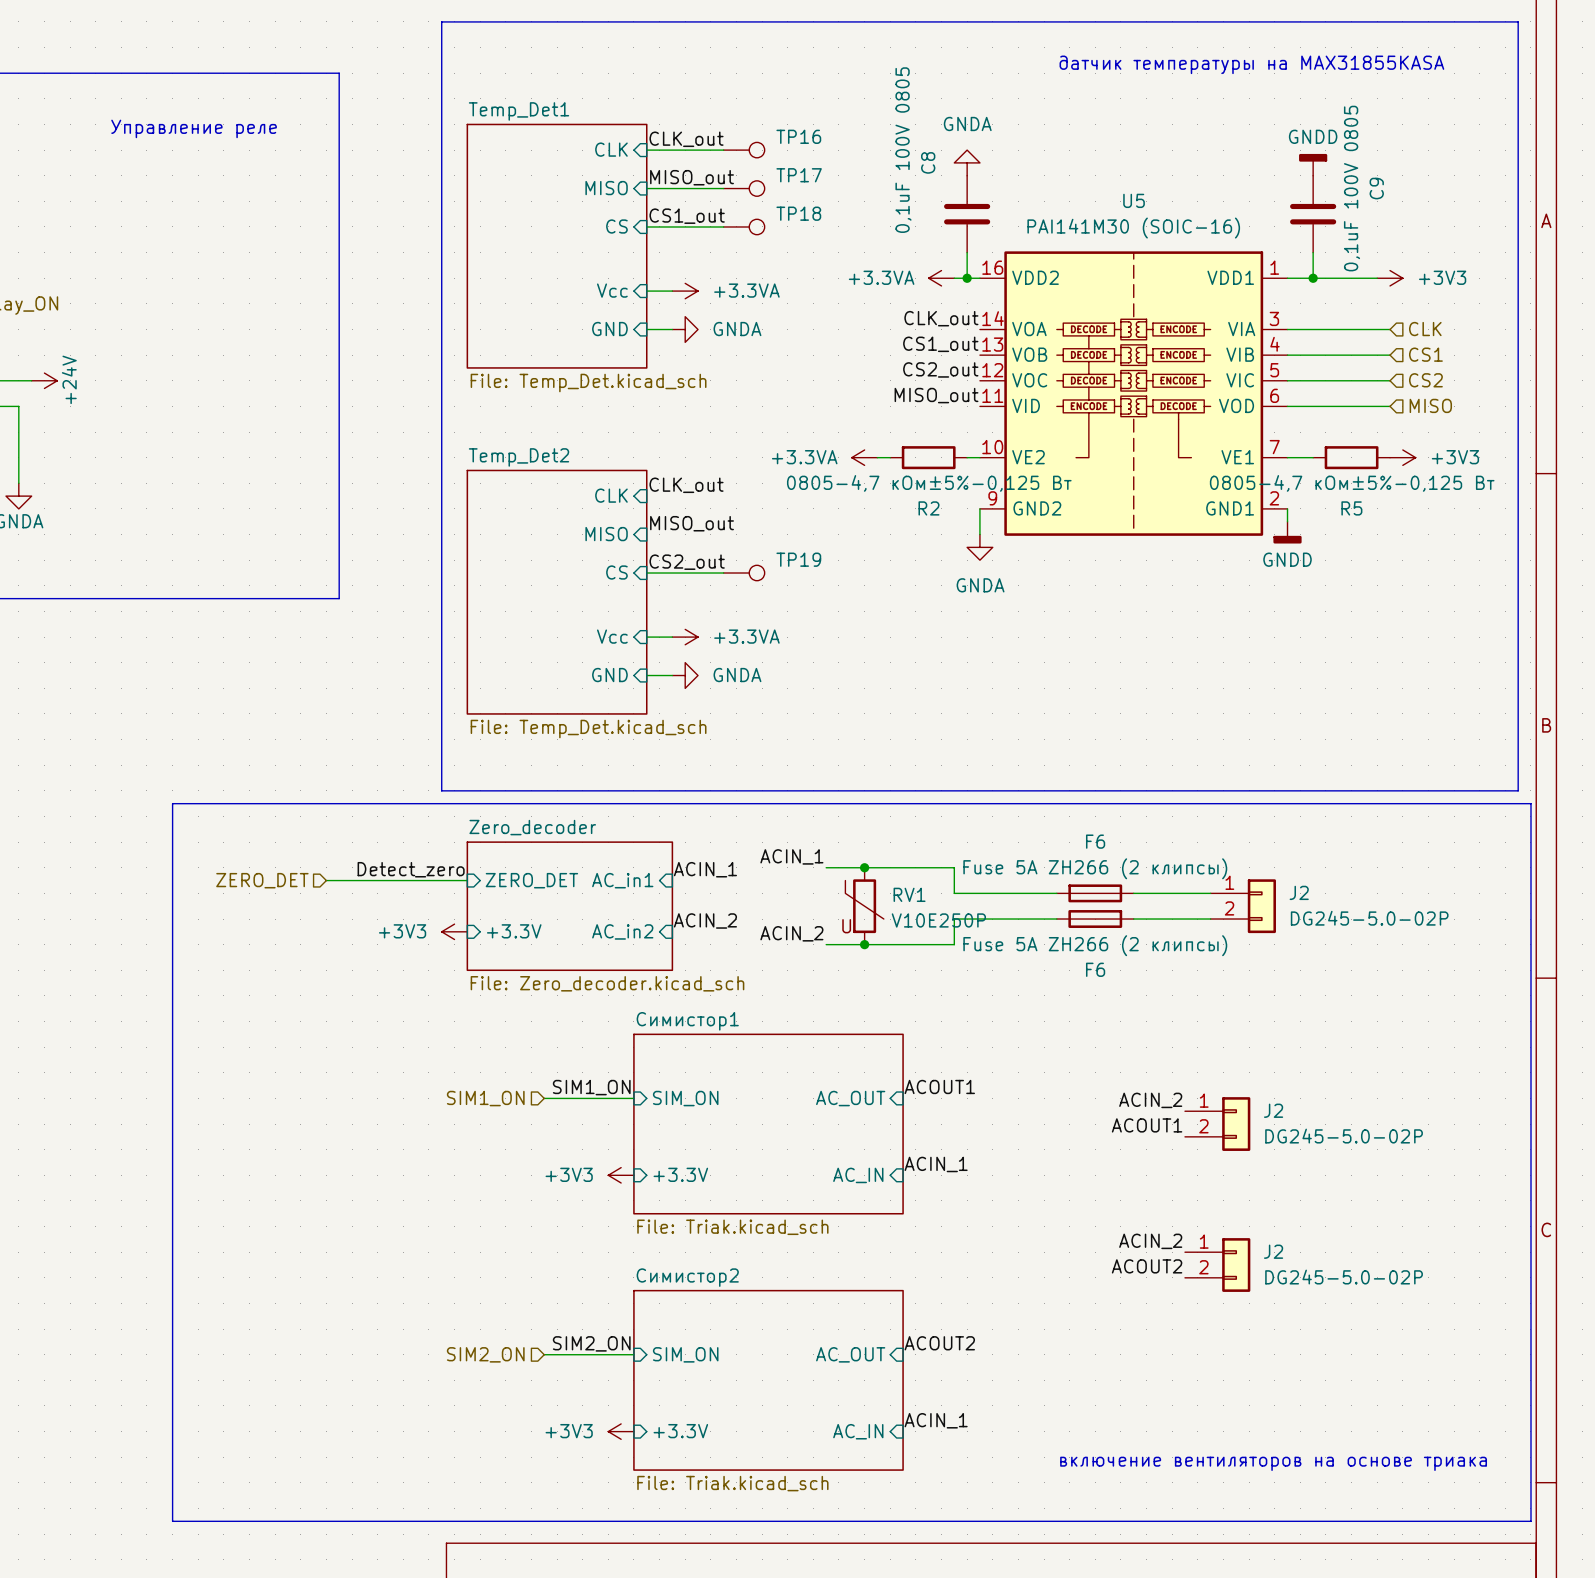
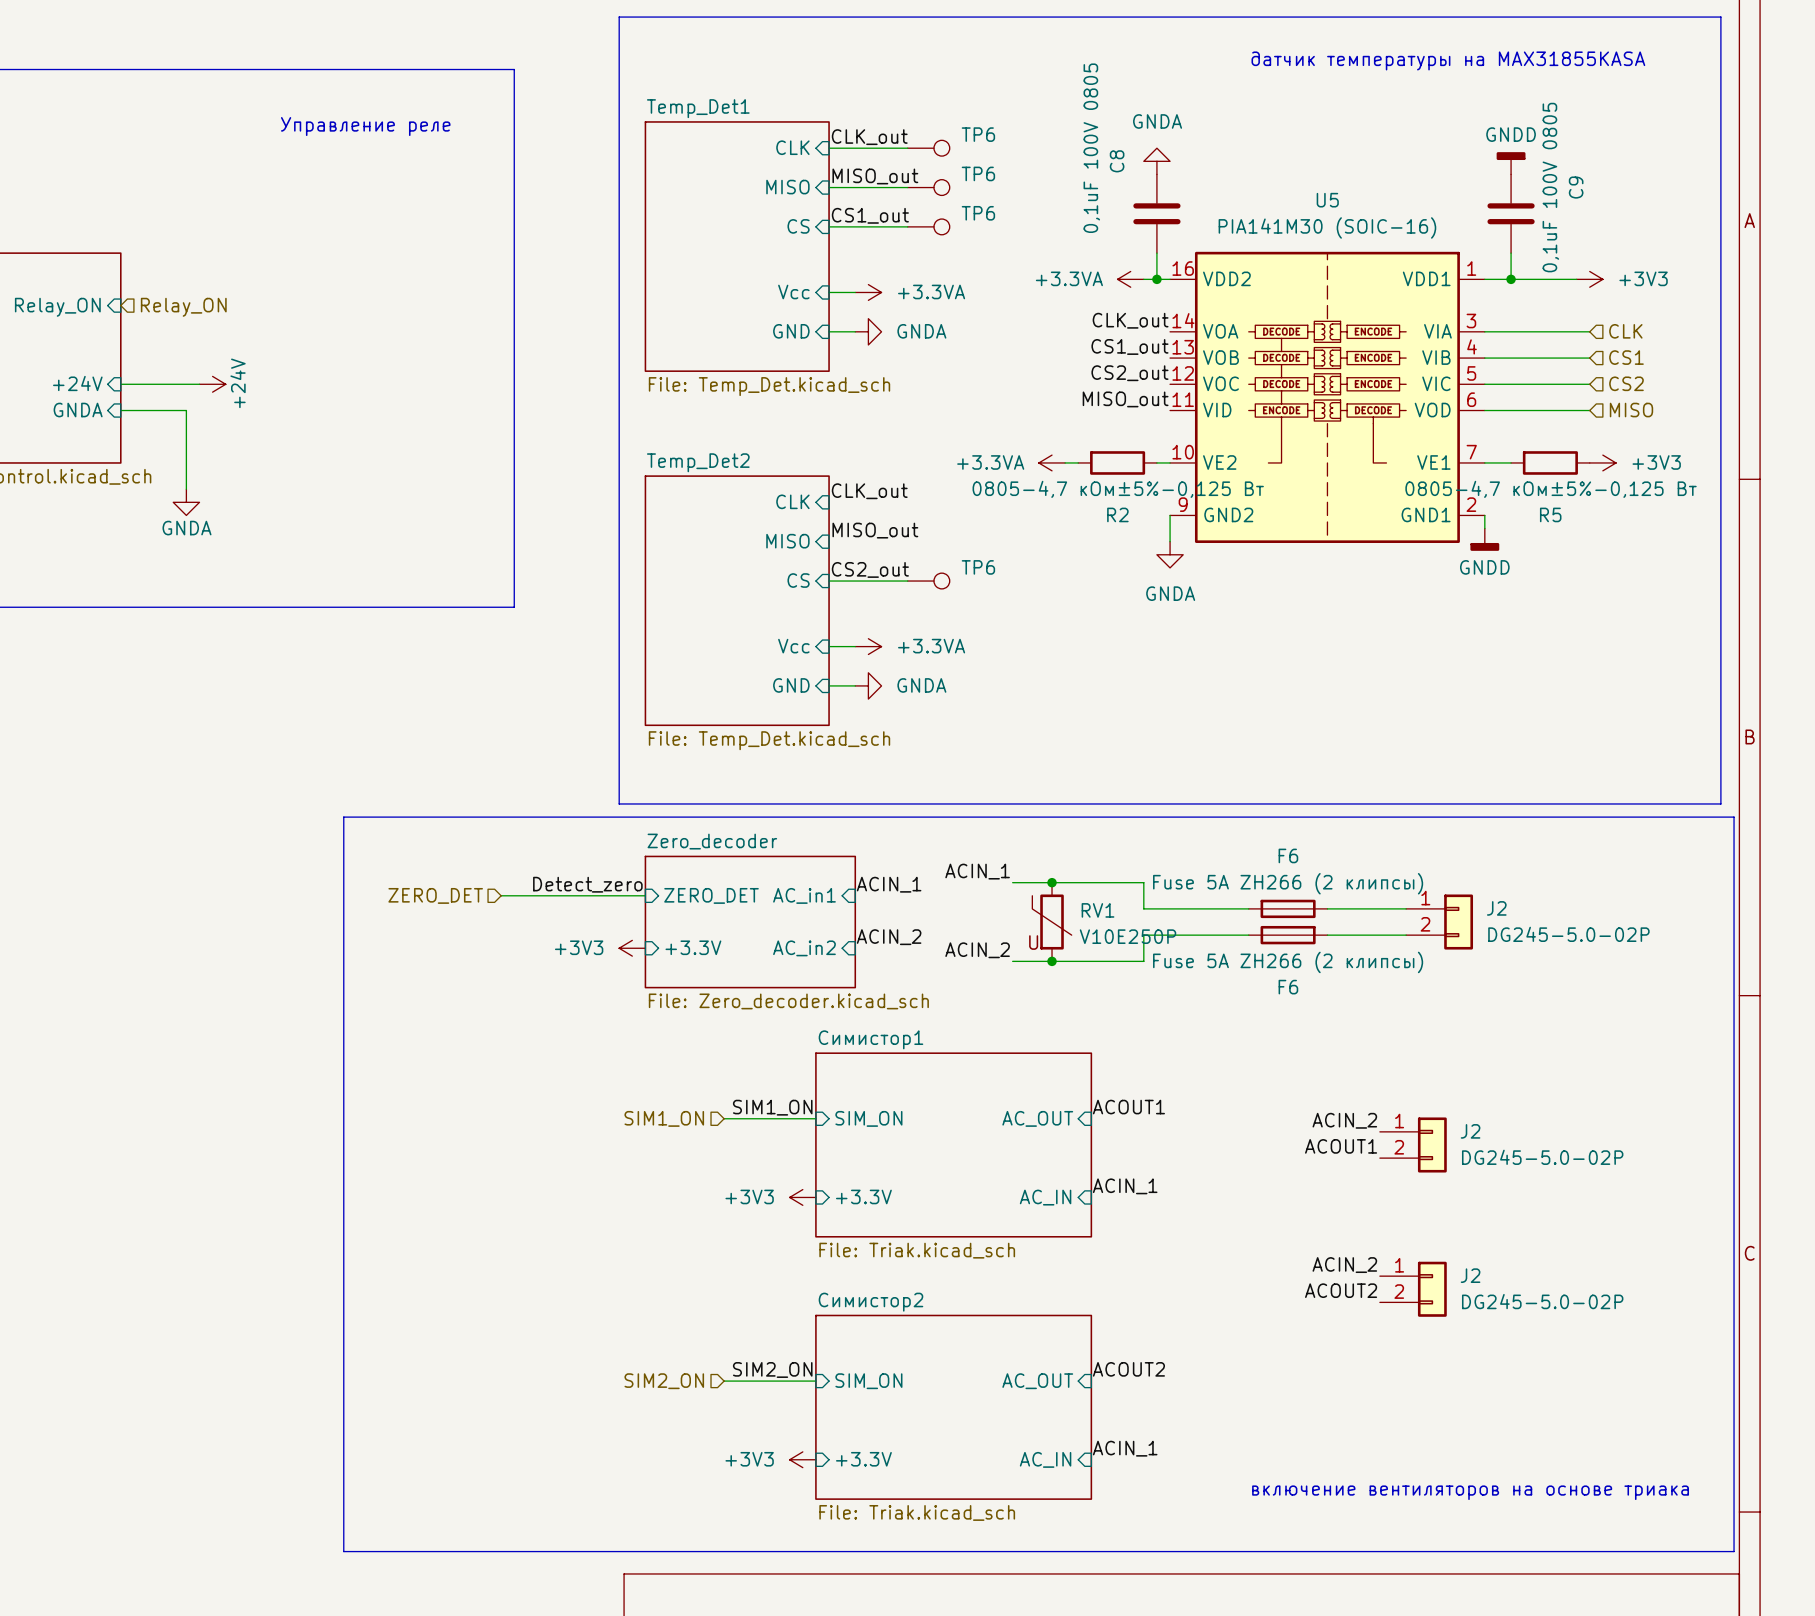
TP16 name: TP16 (798, 136) -> TP6 (978, 134)
TP17 name: TP17 (799, 175) -> TP6 (978, 173)
TP18 name: TP18 (798, 213) -> TP6 (978, 213)
U5 value: PAI141M30 (SOIC-16) (1133, 228) -> PIA141M30 (SOIC-16) (1327, 227)
TP19 name: TP19 (798, 559) -> TP6 (978, 567)

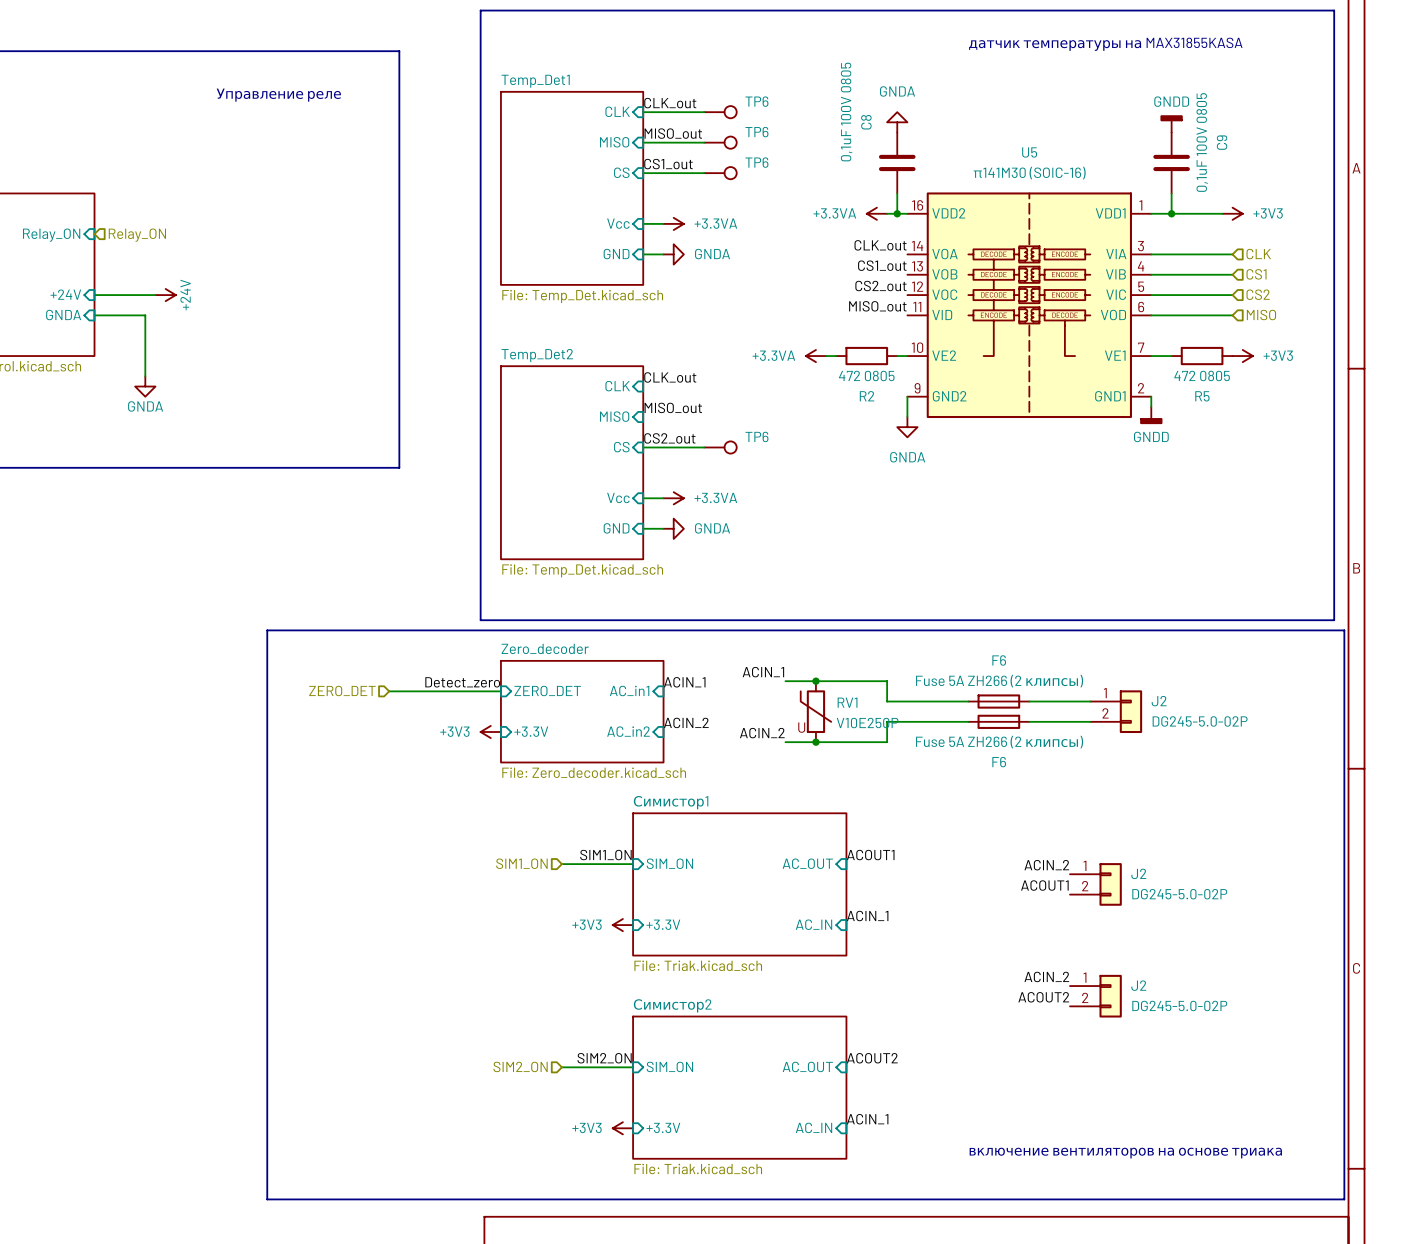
U5 value: PIA141M30 (SOIC-16) (1327, 227) -> π141M30 (SOIC-16) (1029, 173)
R2 value: 0805-4,7 кОм±5%-0,125 Вт (1118, 489) -> 472 0805 (866, 375)
R5 value: 0805-4,7 кОм±5%-0,125 Вт (1551, 489) -> 472 0805 (1202, 375)

